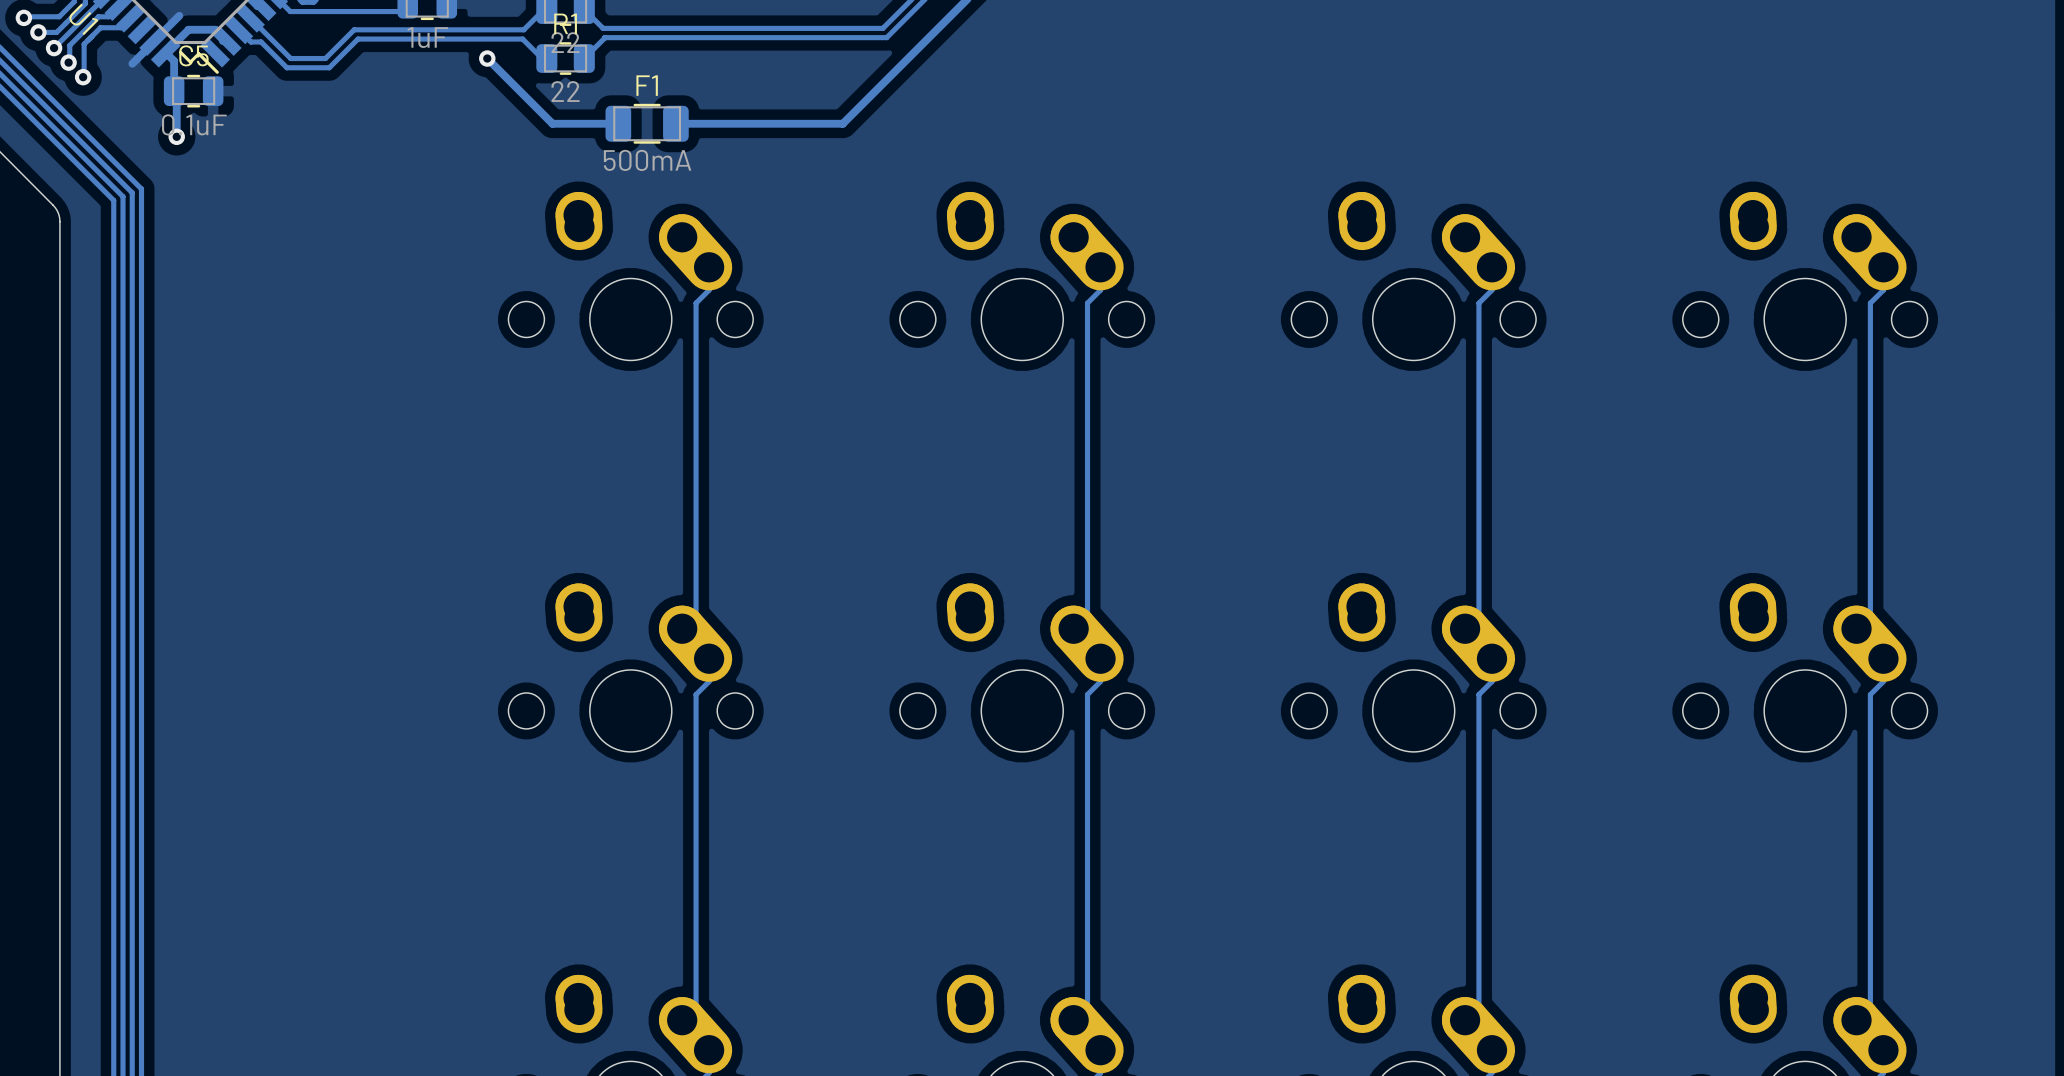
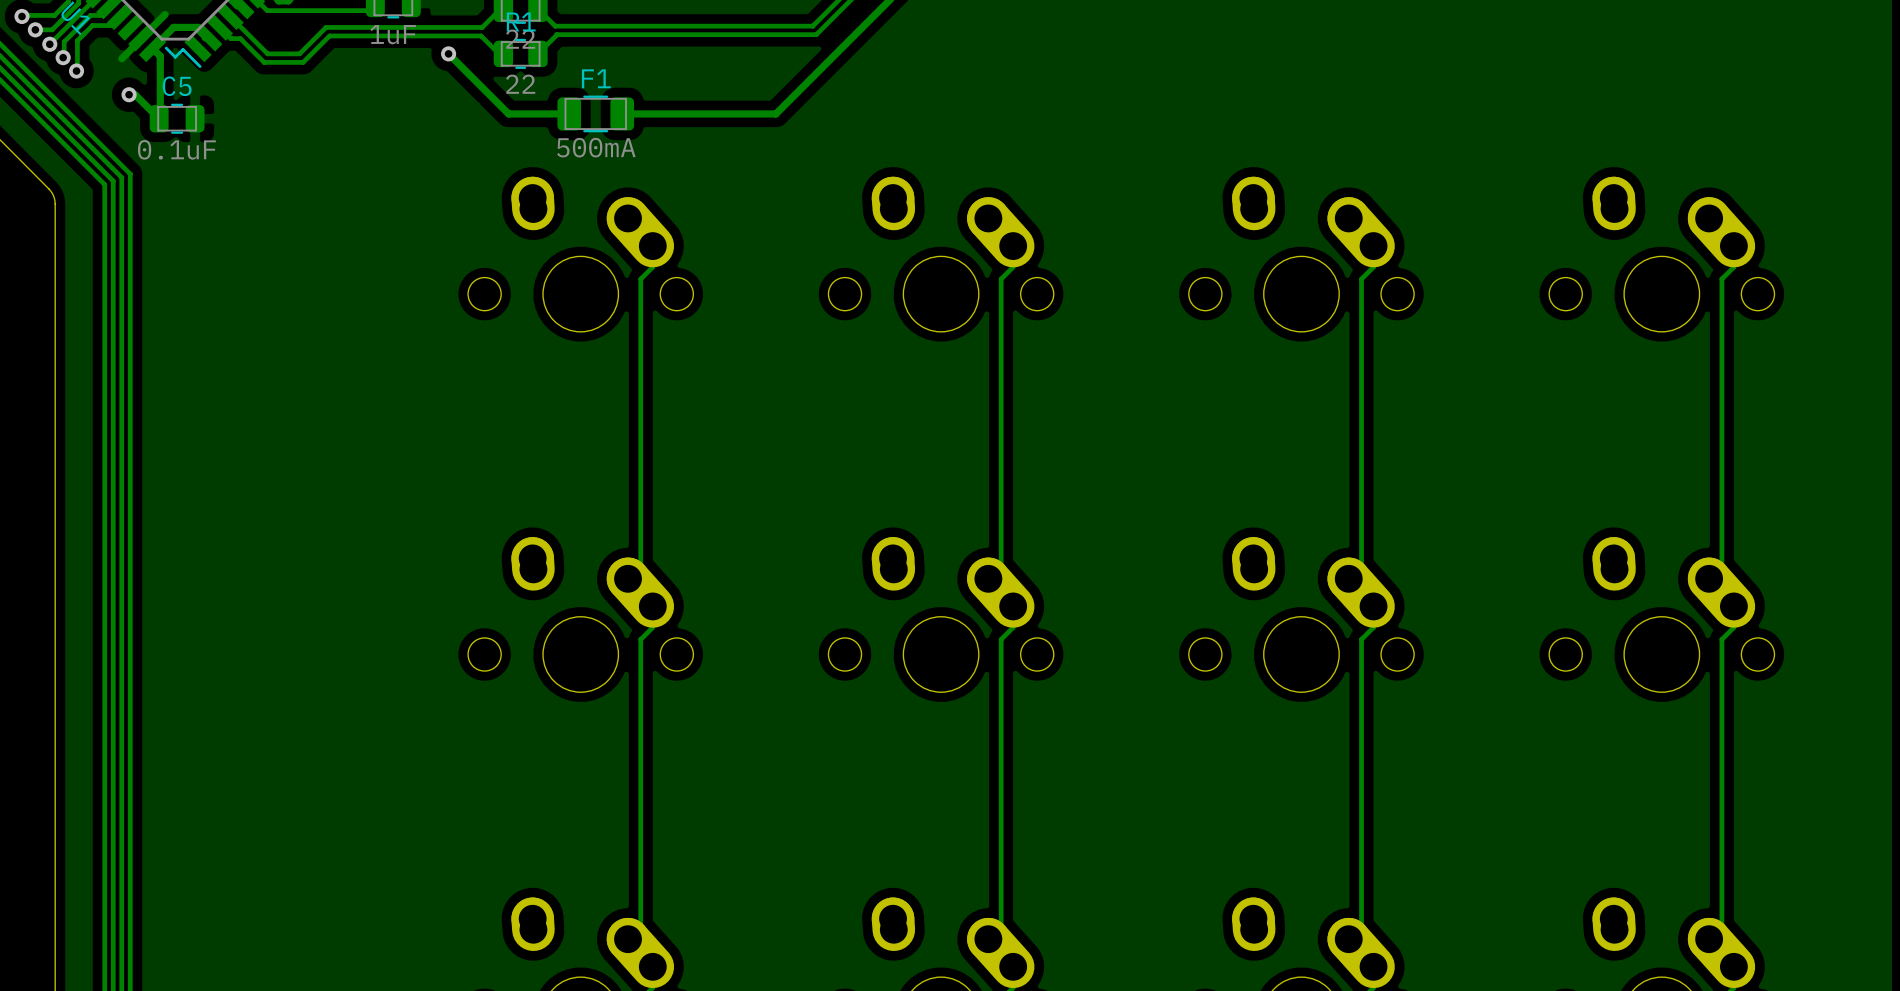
track: (174, 91) (176, 93) (176, 136) -> (160, 83) (159, 118) (135, 94) (129, 94)
C5 position: (193, 91) -> (177, 118)
via position: (176, 136) -> (129, 94)

